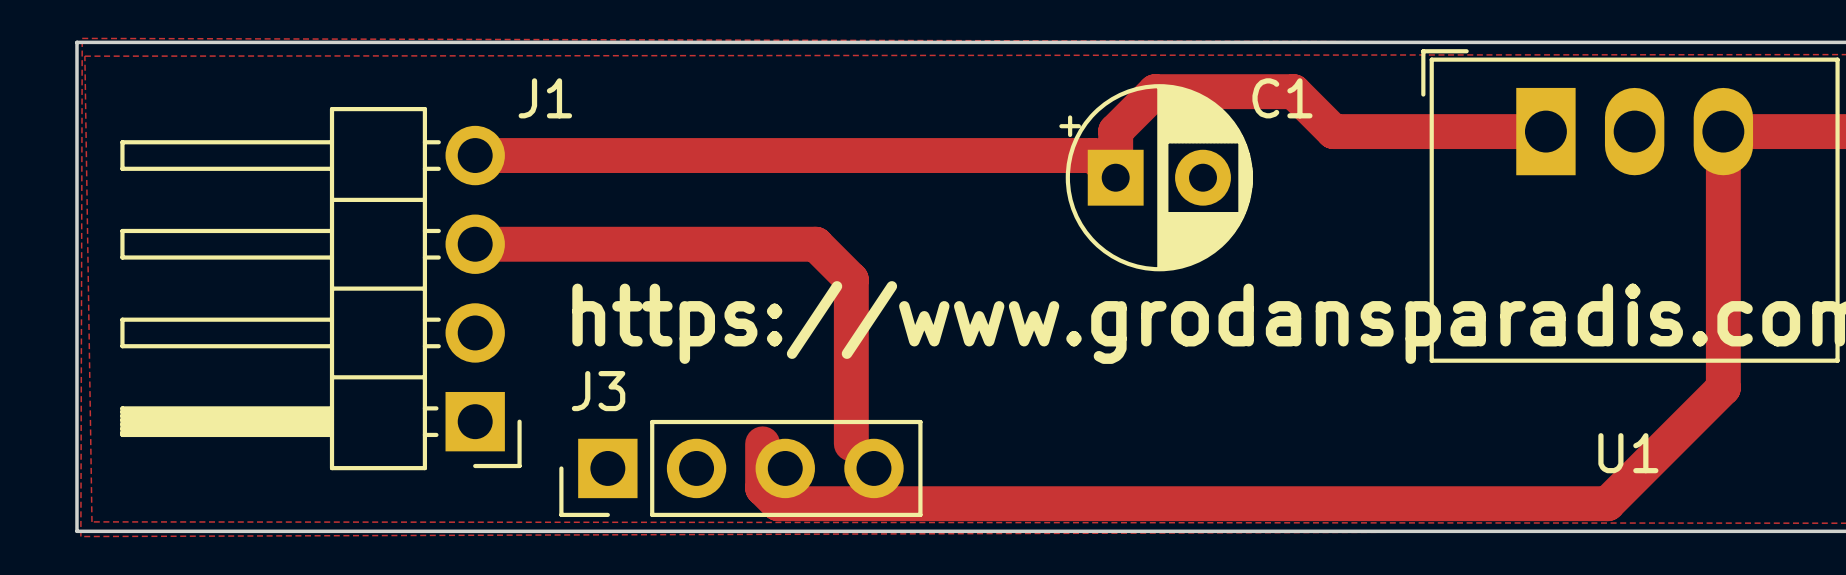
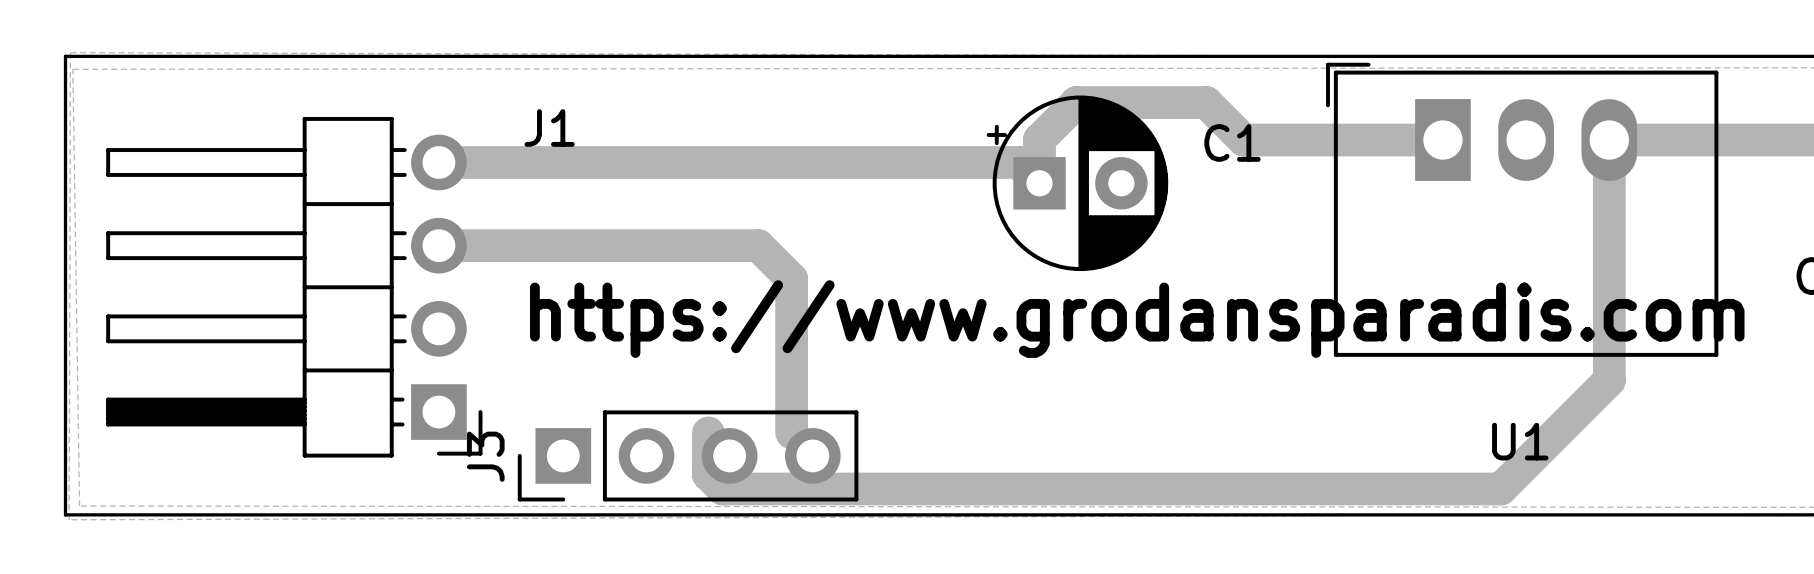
J1 name position: J1 (545, 98) -> J1 (549, 127)
C1 name position: C1 (1282, 98) -> C1 (1232, 142)
J3 name rotation: 0° (598, 391) -> 90° counterclockwise (485, 456)
J3 name position: J3 (598, 391) -> J3 (485, 456)

